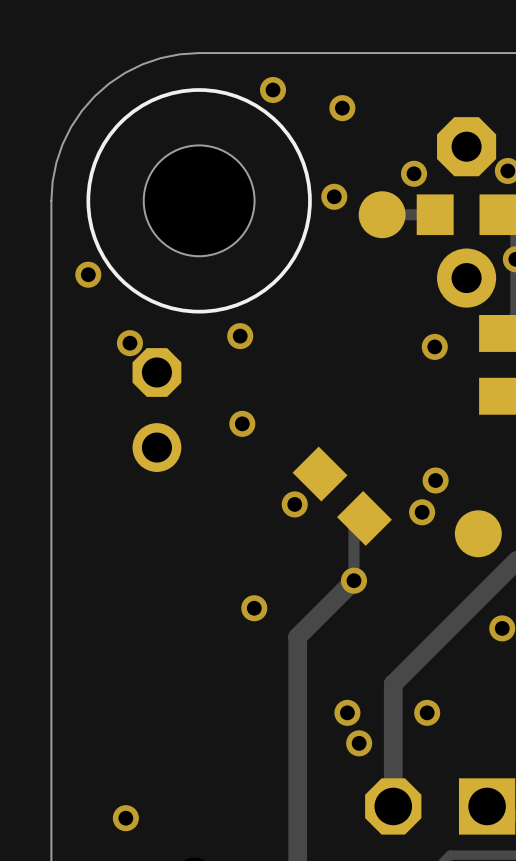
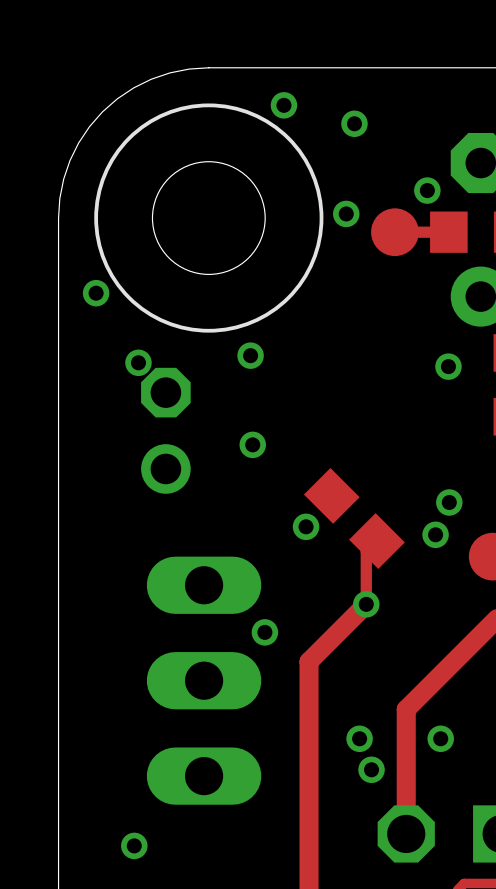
part: none -> (204, 680)

